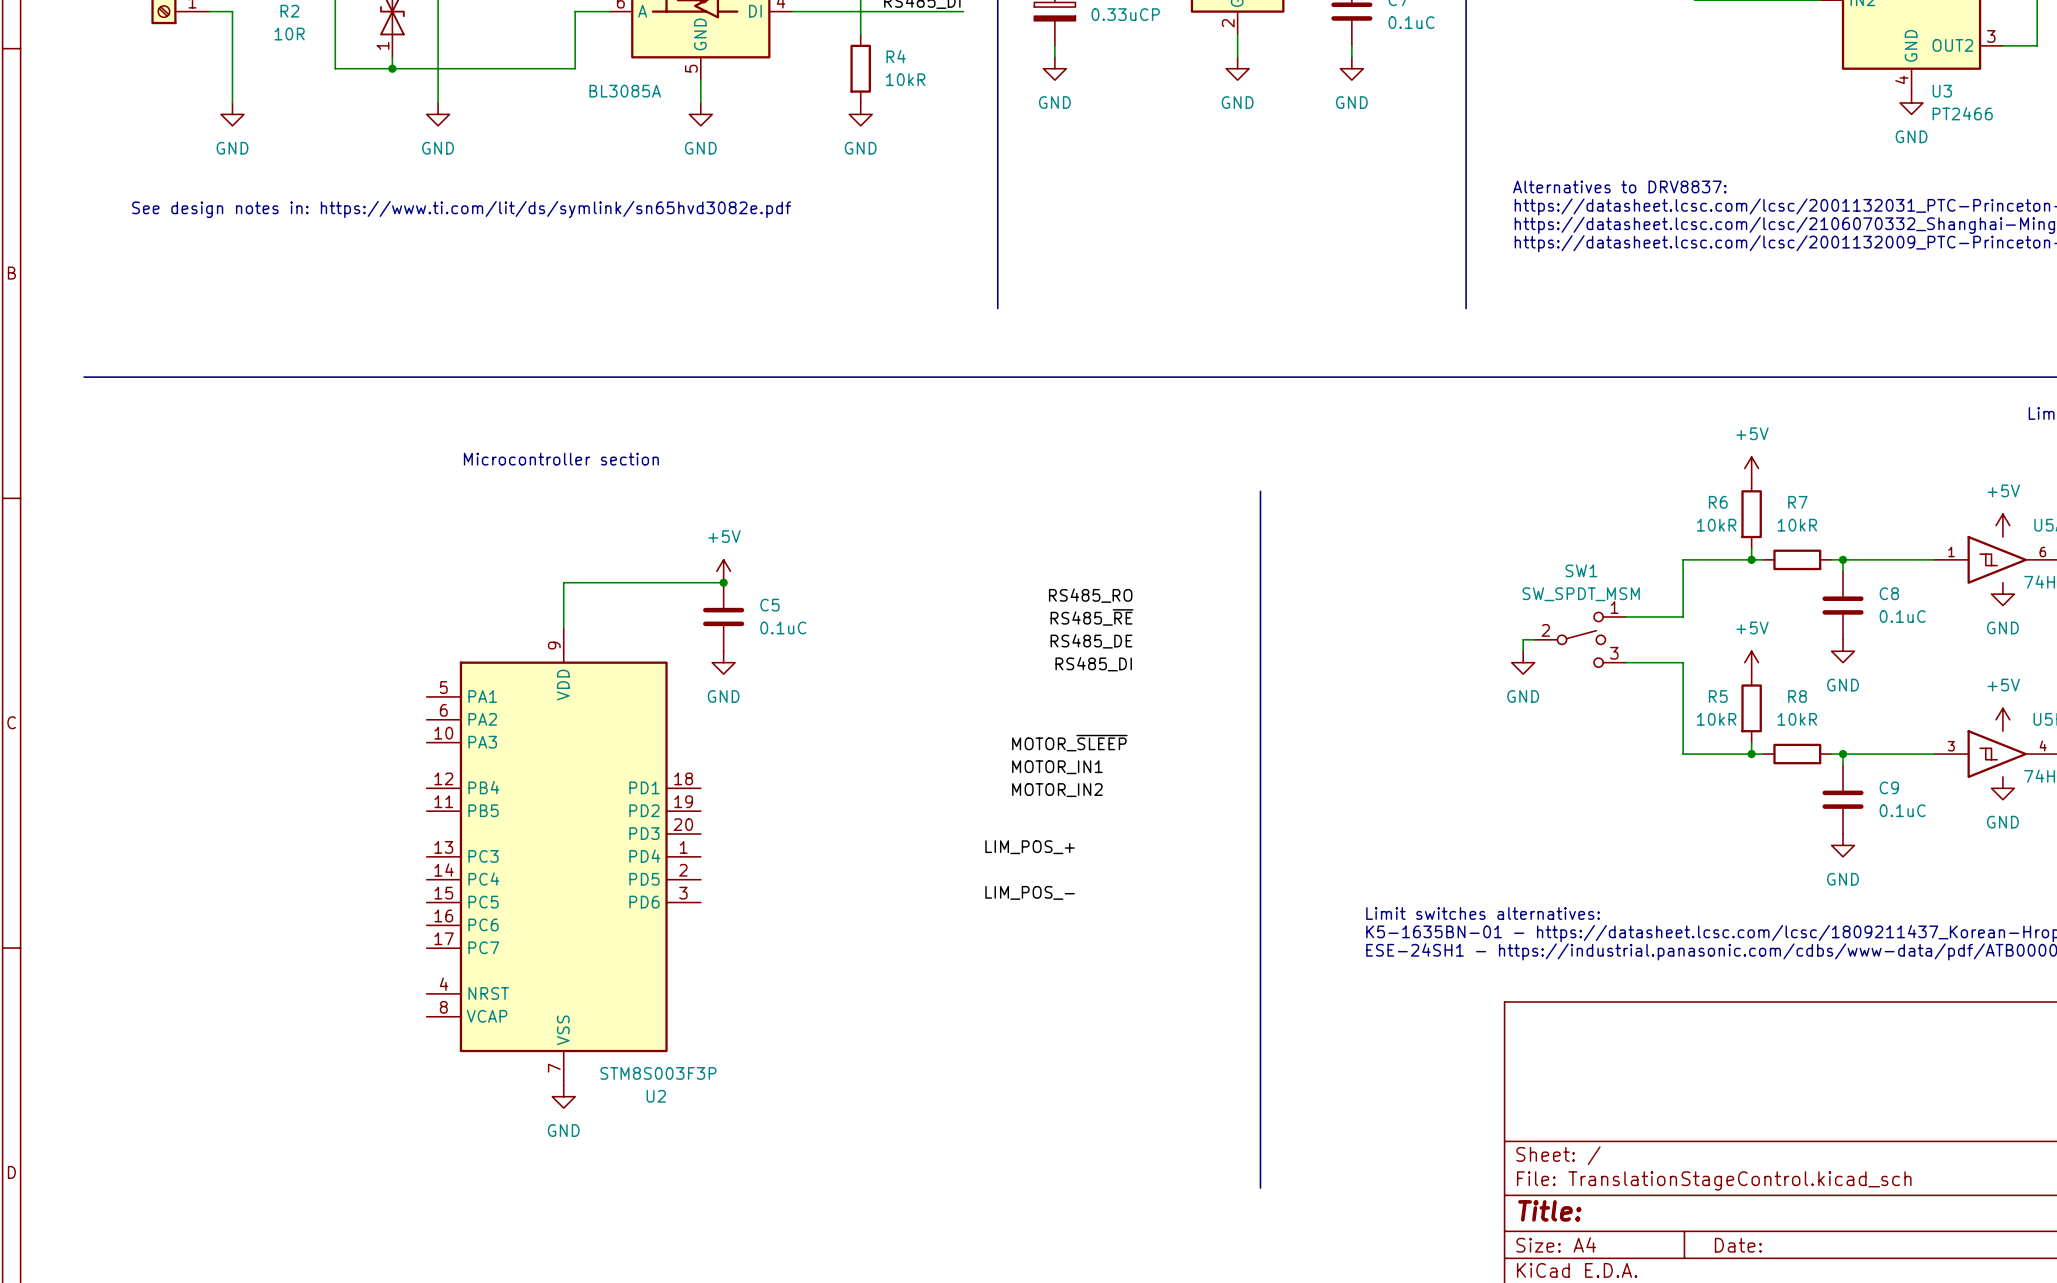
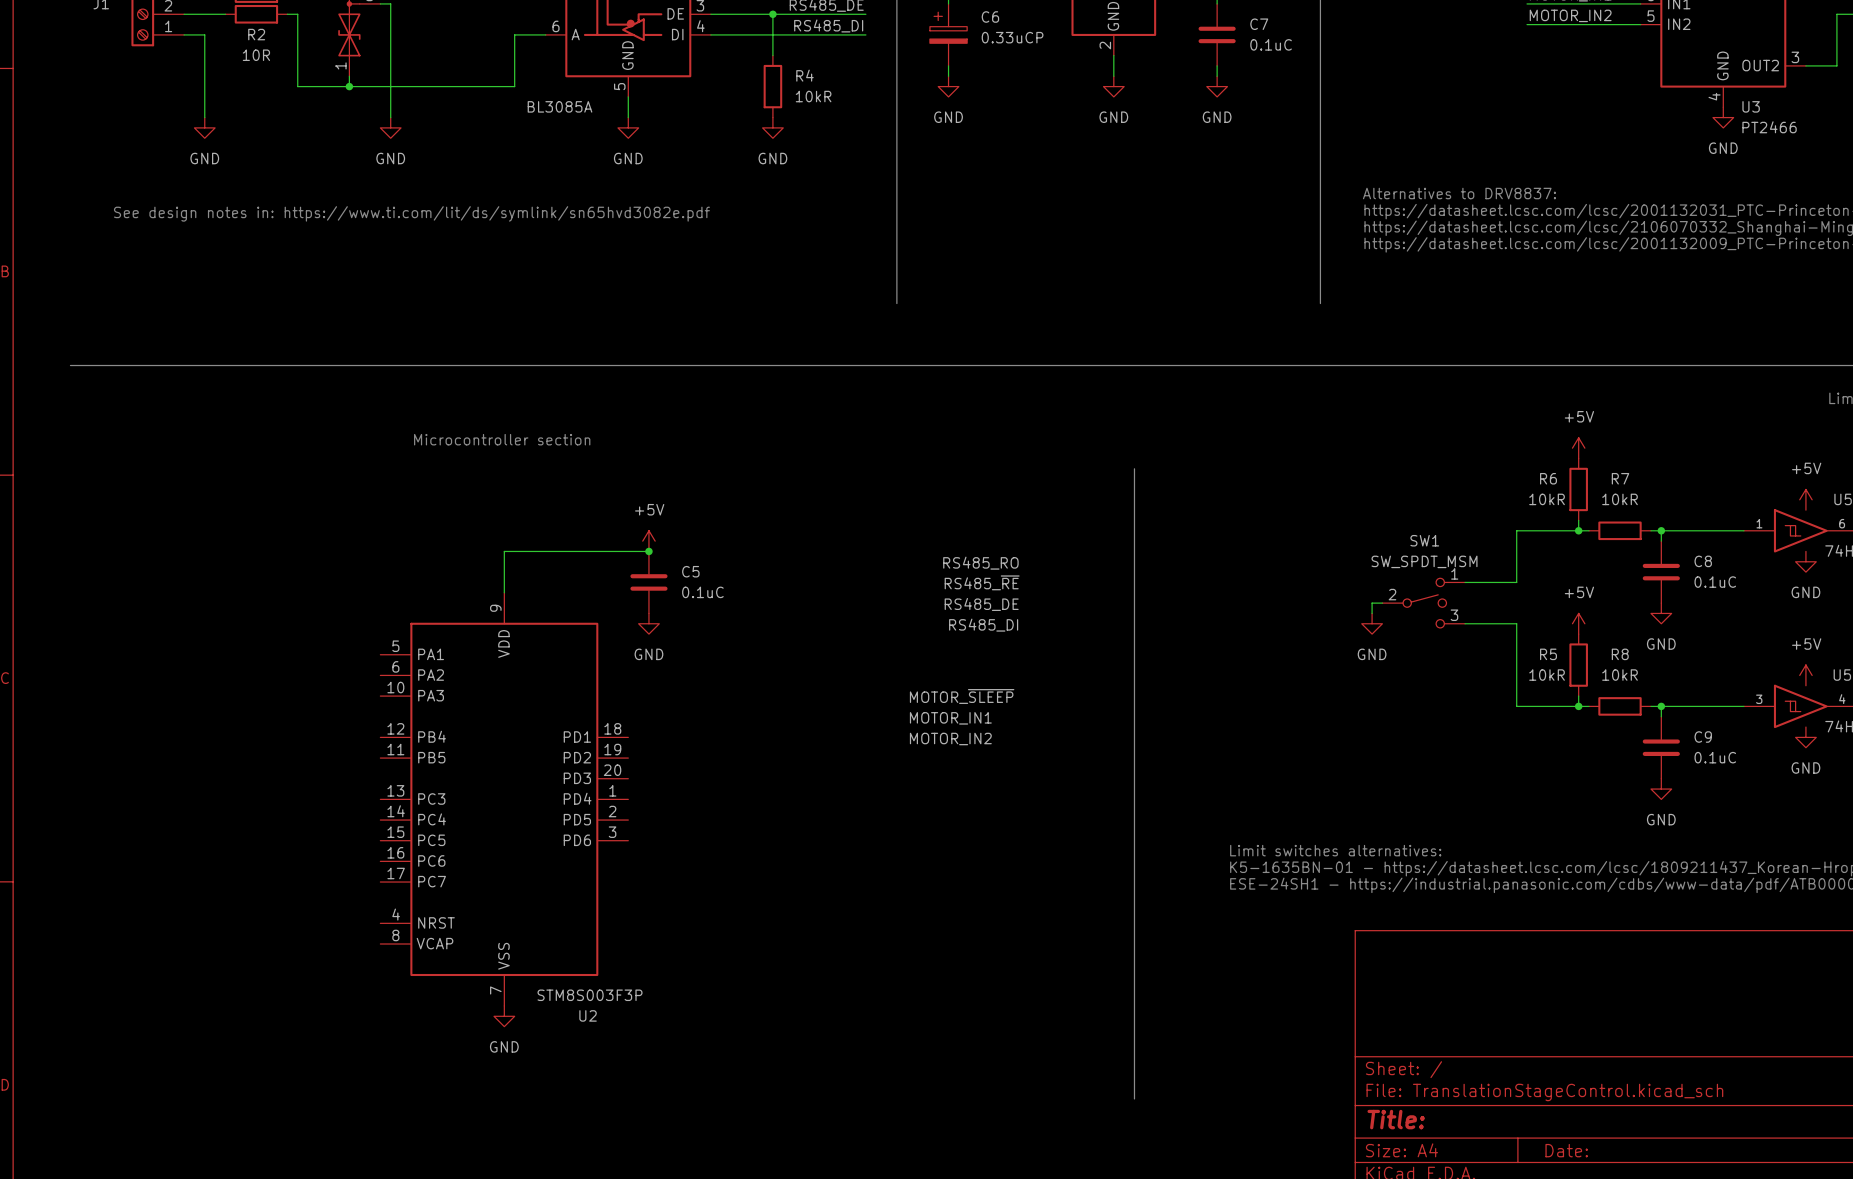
label: LIM_POS_+ (1030, 847) -> none
label: LIM_POS_- (1030, 892) -> none

